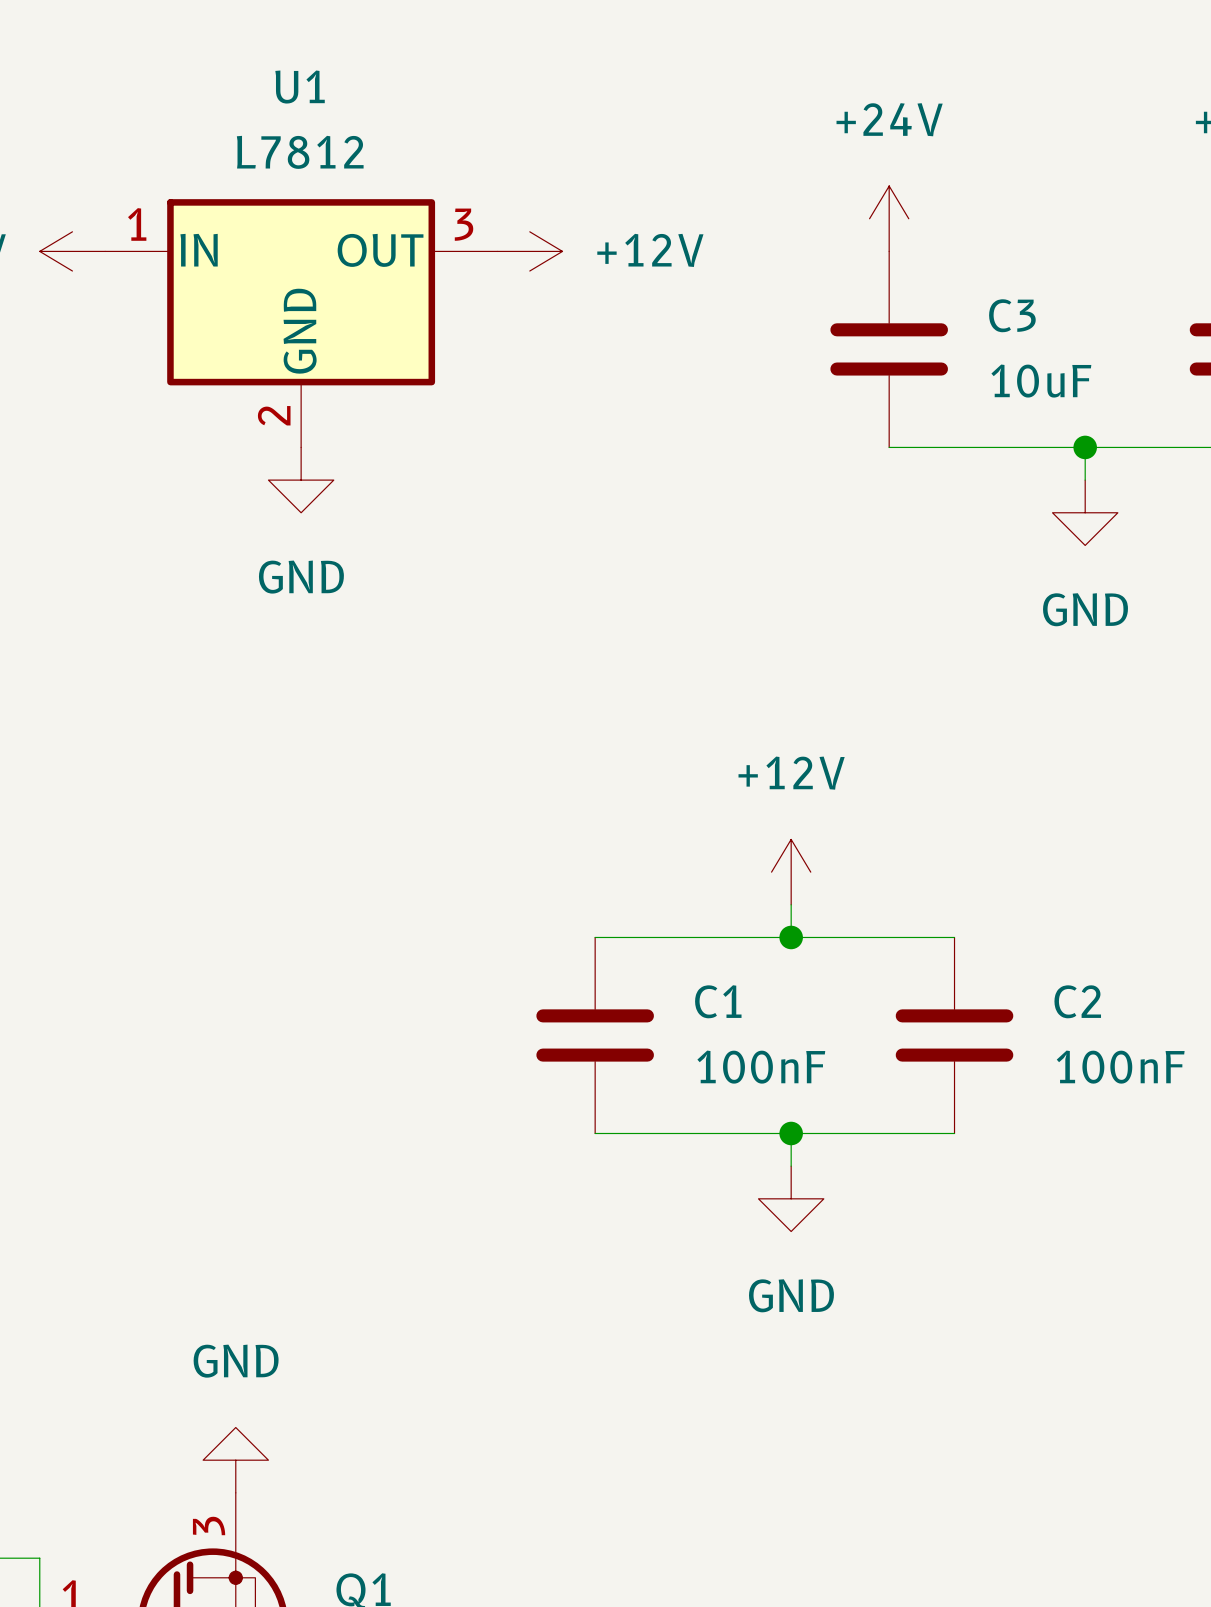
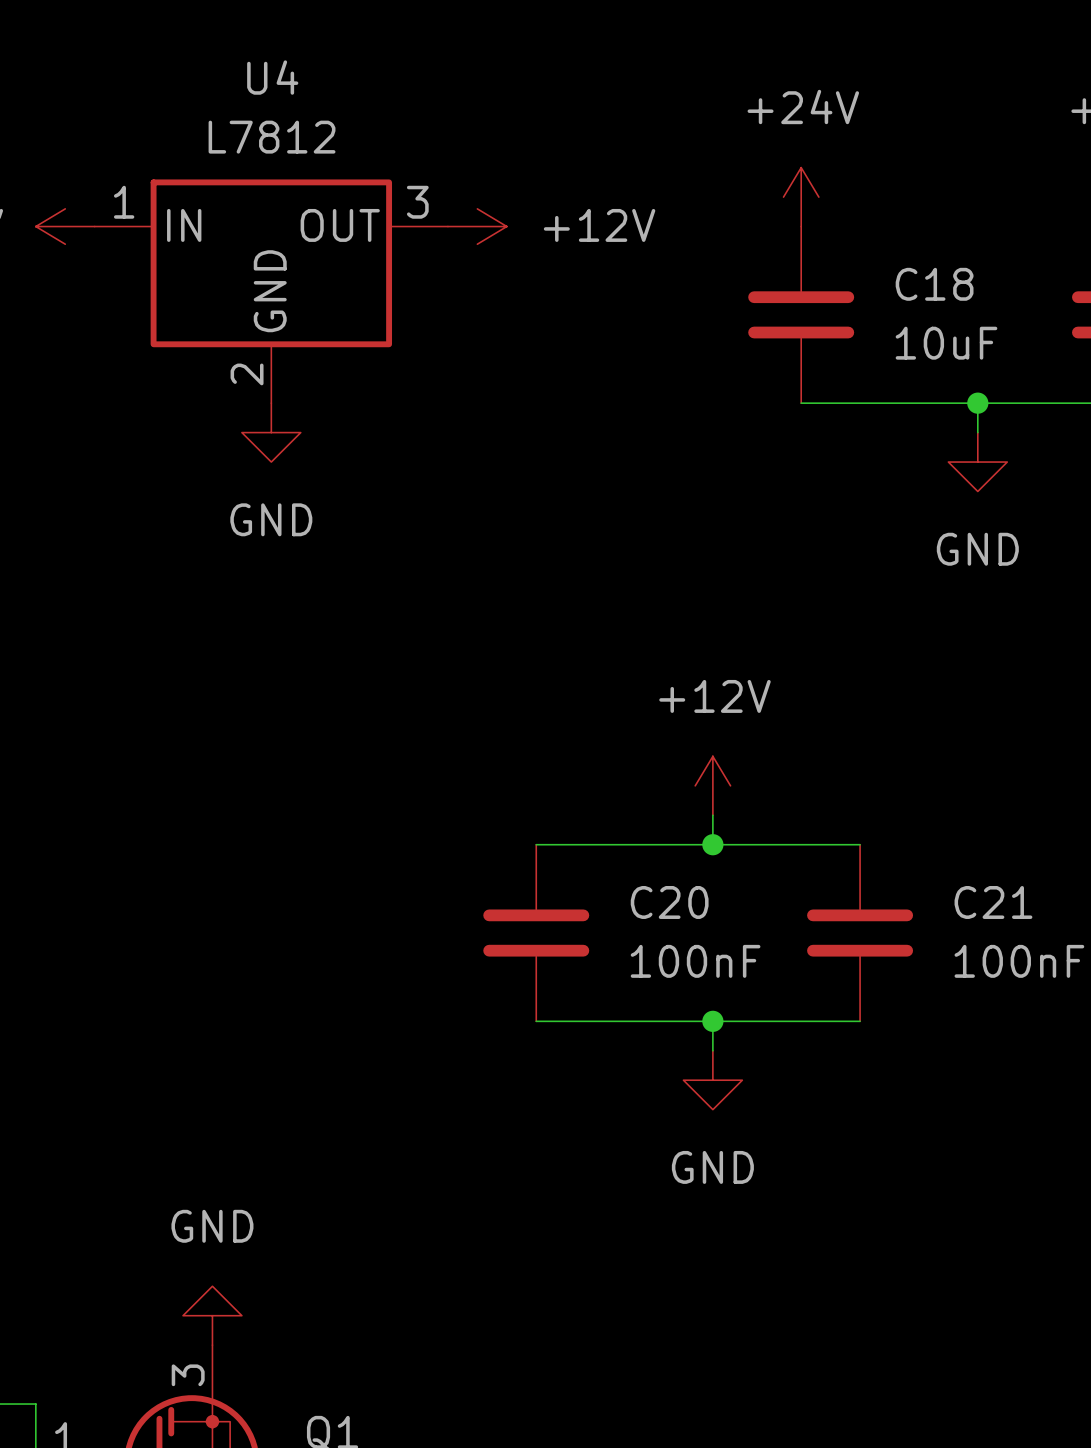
U1 name: U1 (300, 87) -> U4 (272, 77)
C3 name: C3 (1012, 315) -> C18 (934, 284)
C1 name: C1 (718, 1001) -> C20 (669, 902)
C2 name: C2 (1077, 1001) -> C21 (993, 902)

